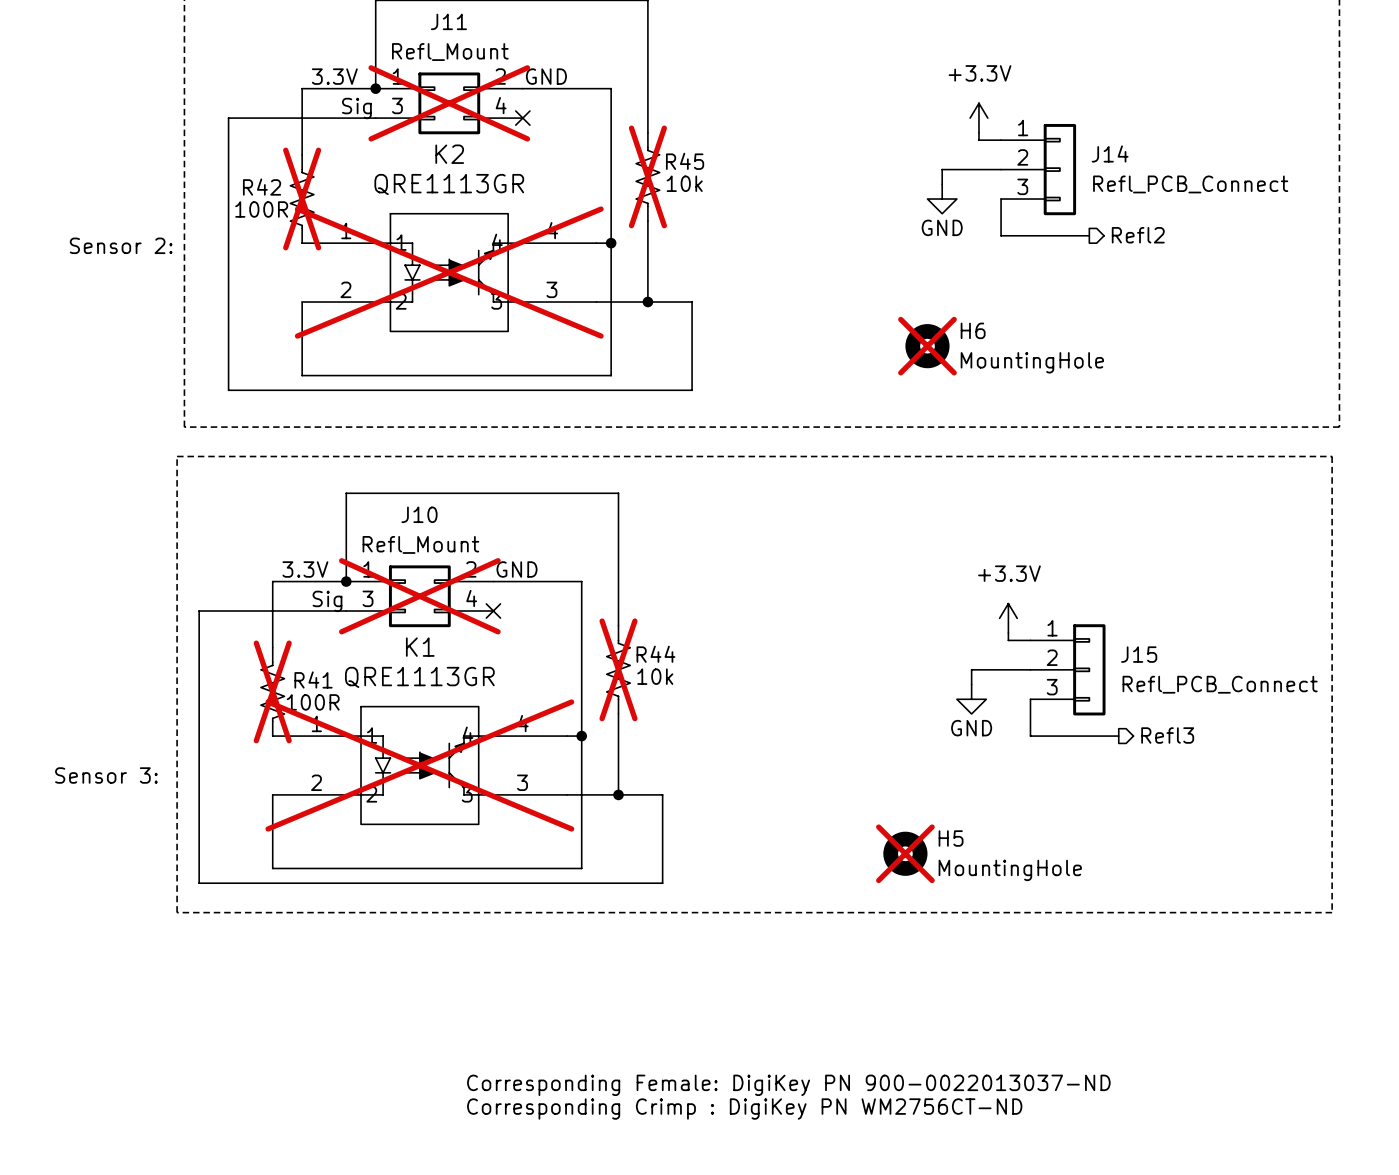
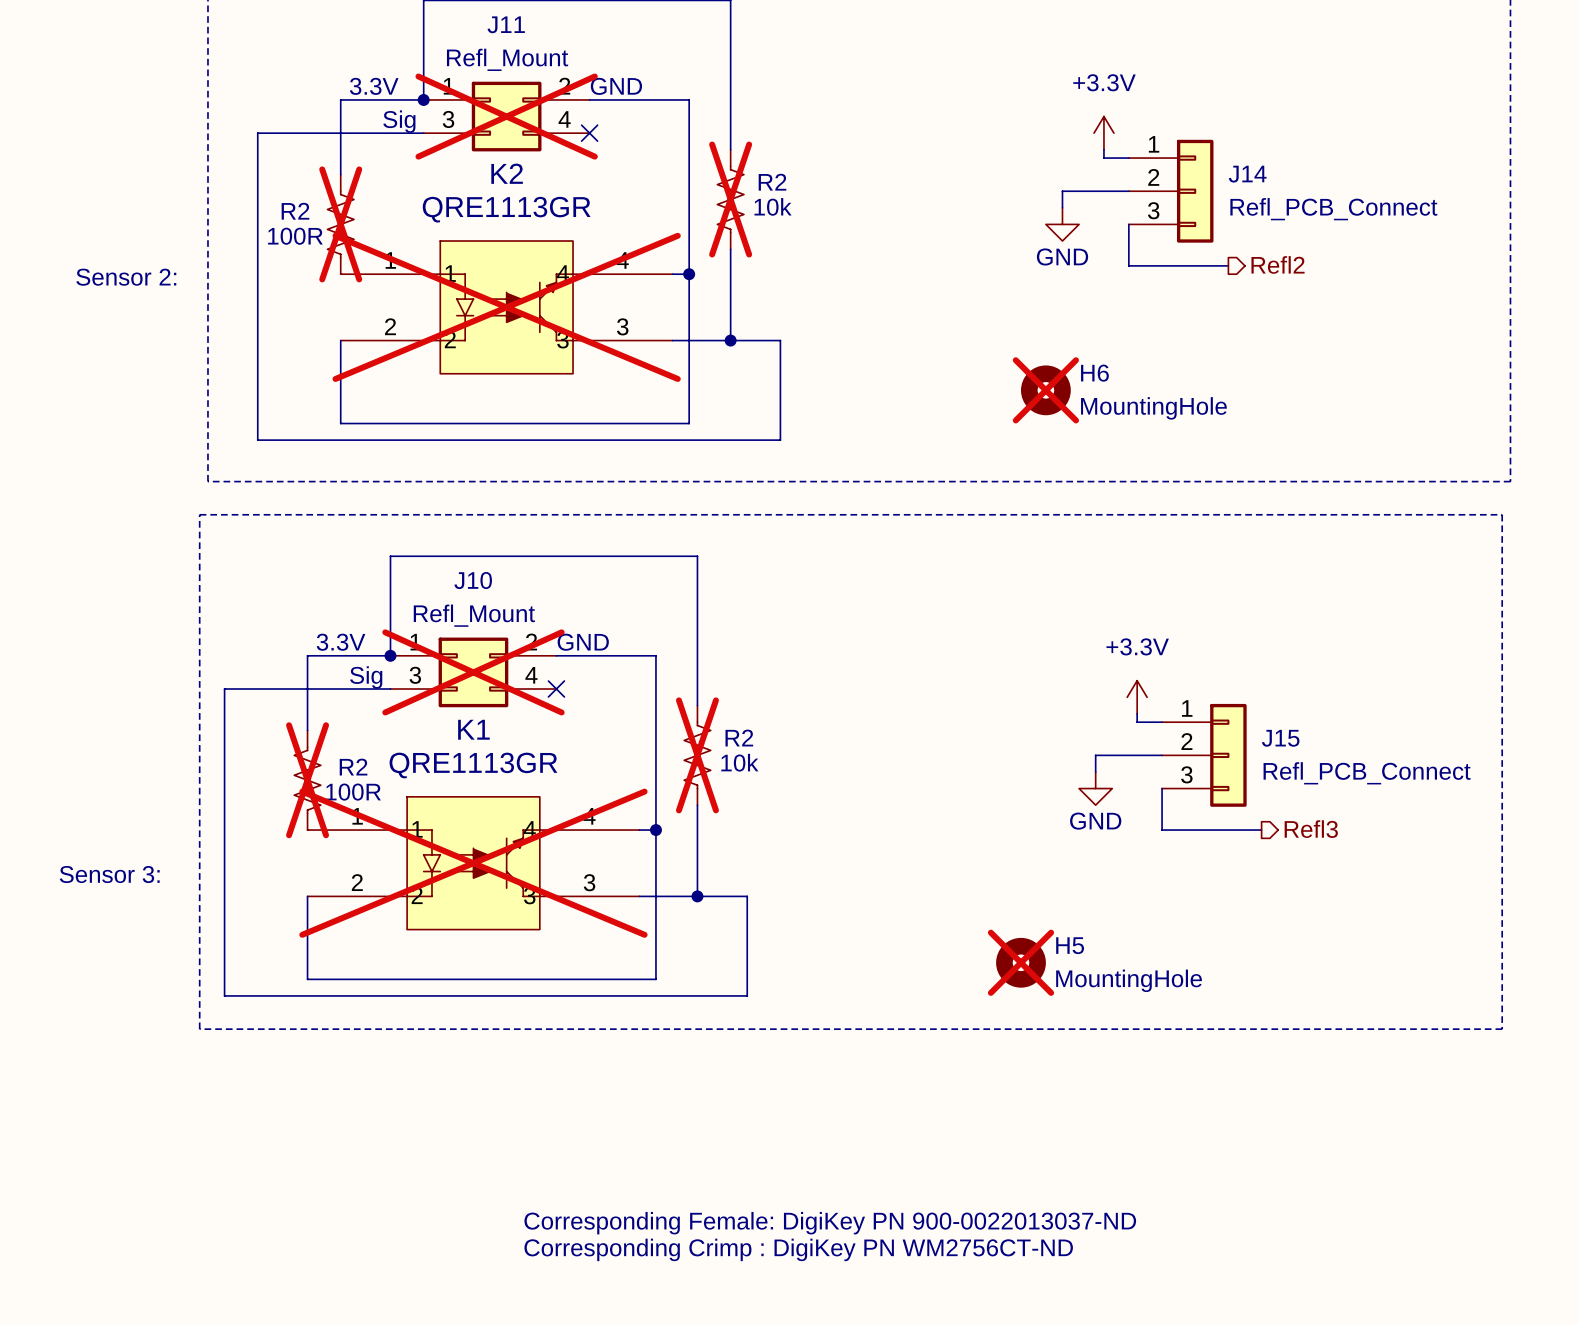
R45 name: R45 (685, 161) -> R2 (772, 182)
R42 name: R42 (262, 187) -> R2 (295, 211)
R44 name: R44 (655, 654) -> R2 (739, 738)
R41 name: R41 (313, 679) -> R2 (353, 767)

